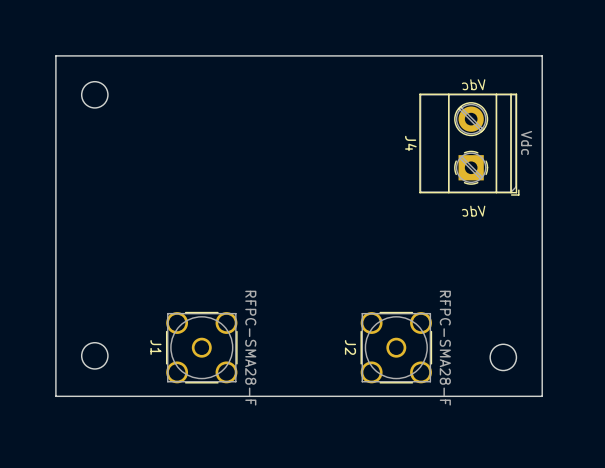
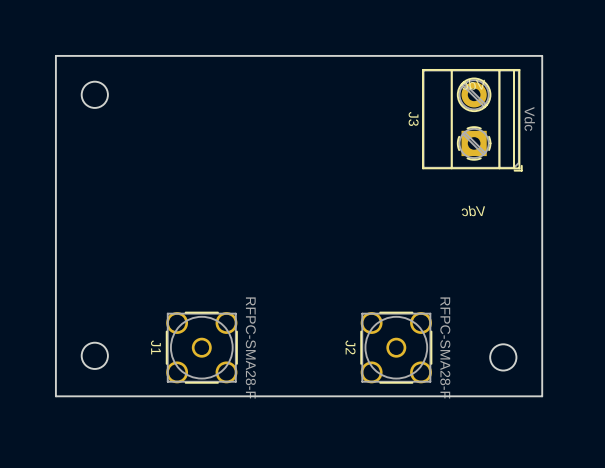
J3: none -> Vdc (472, 120)
J4: Vdc (469, 144) -> none

